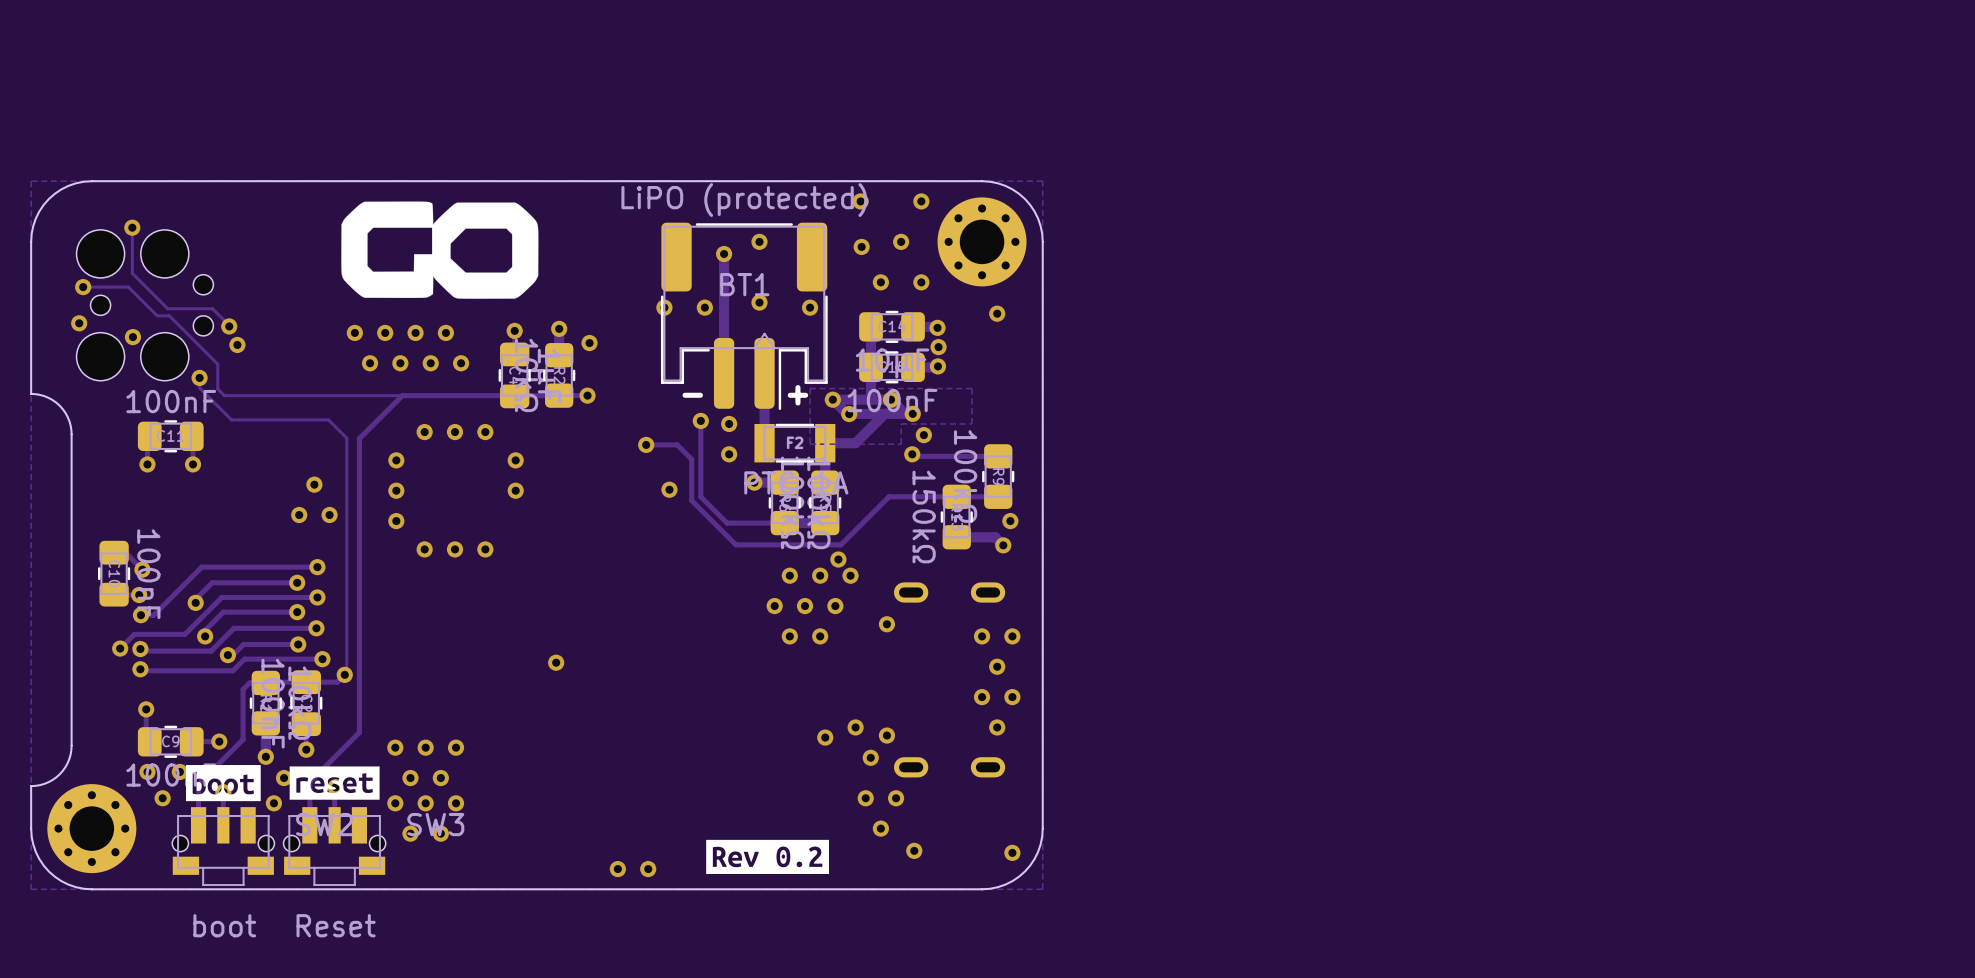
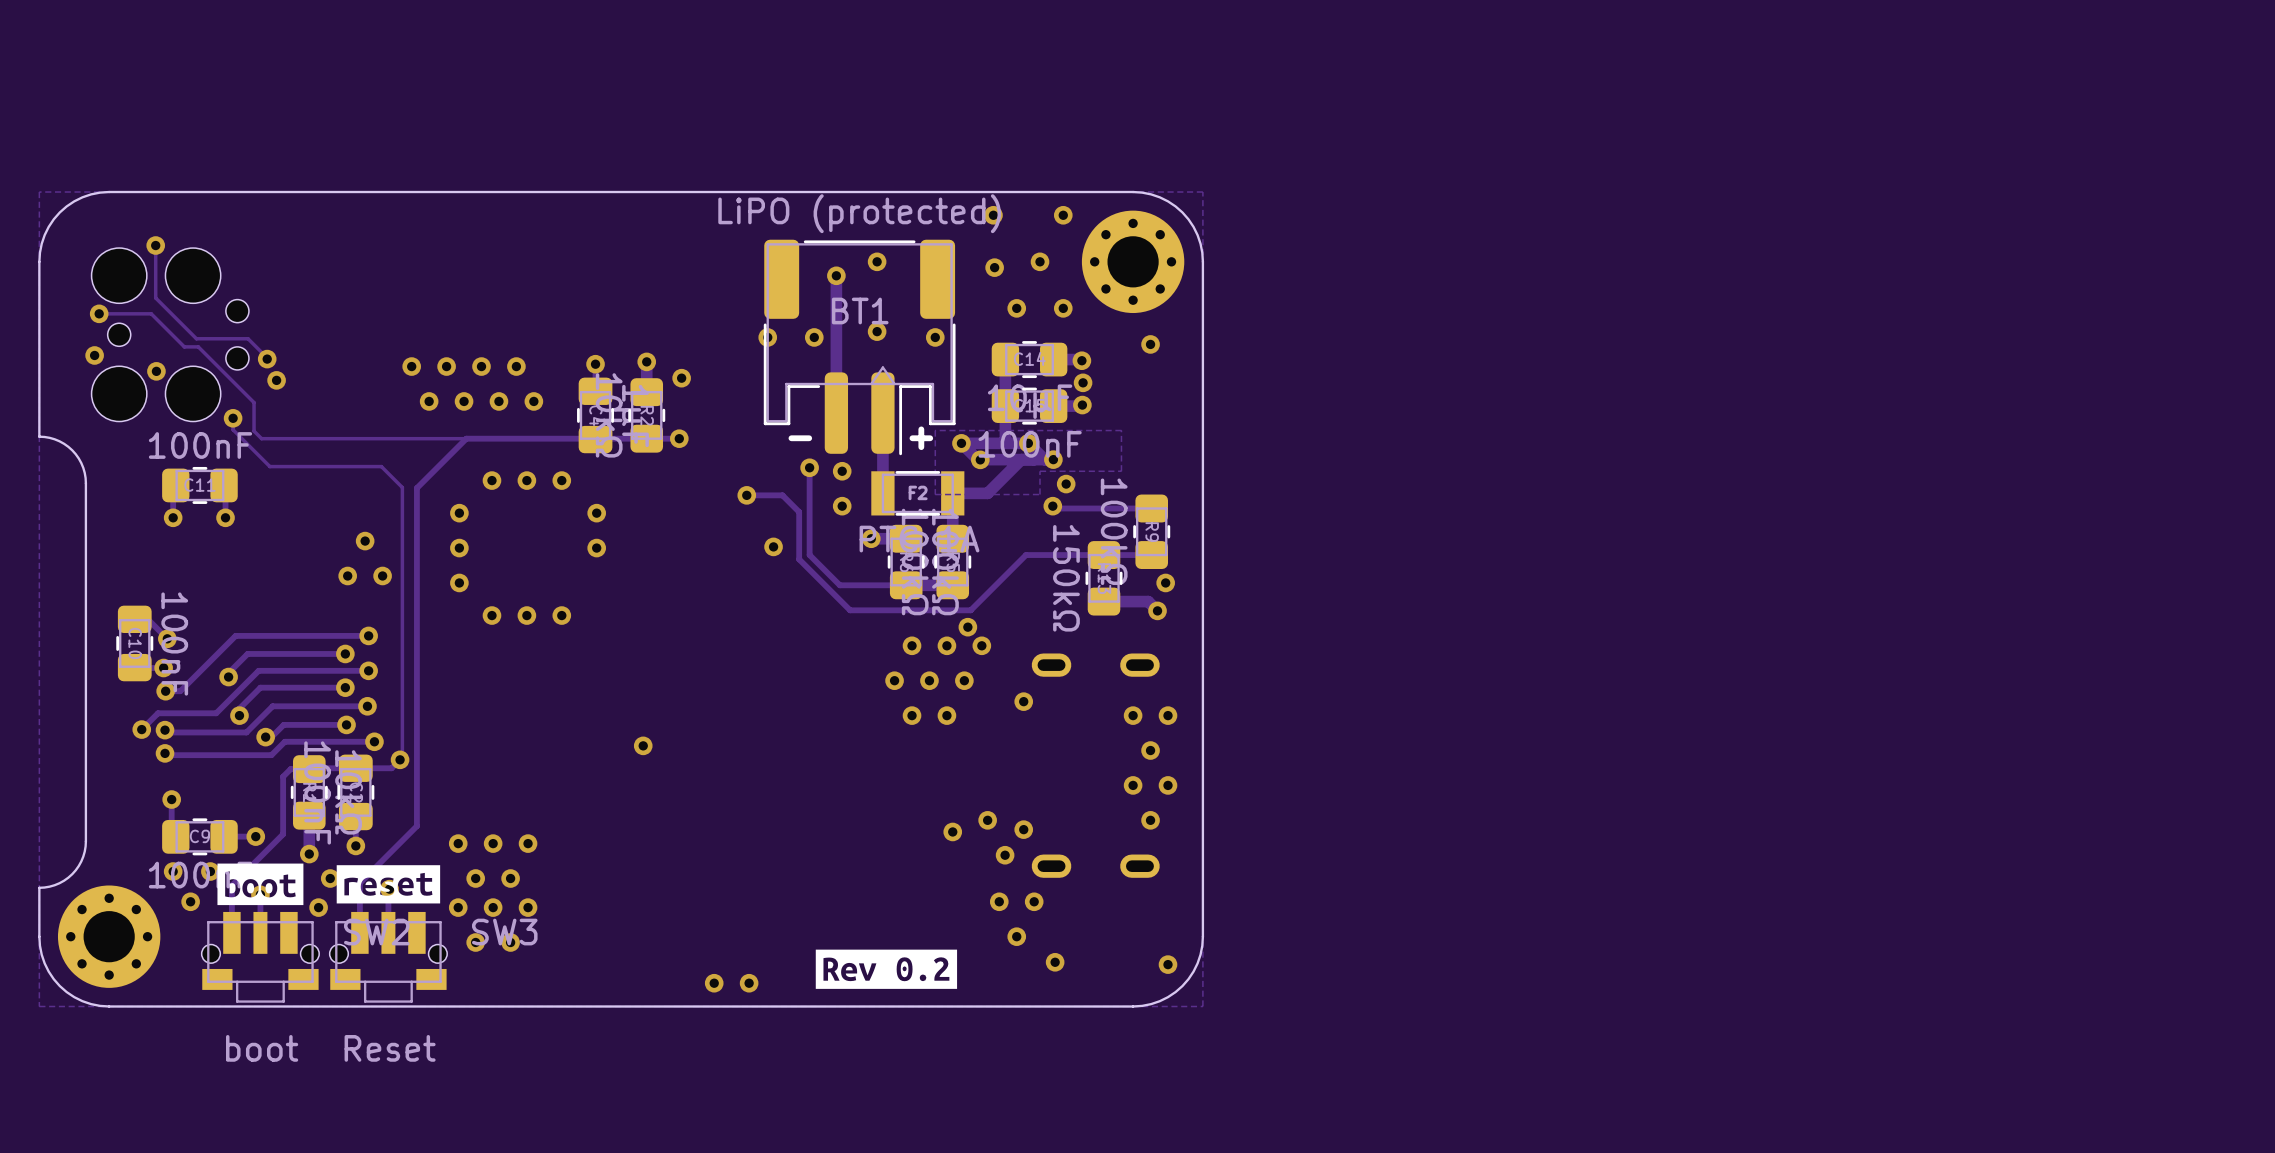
drawing: [341, 201, 539, 299] -> none

